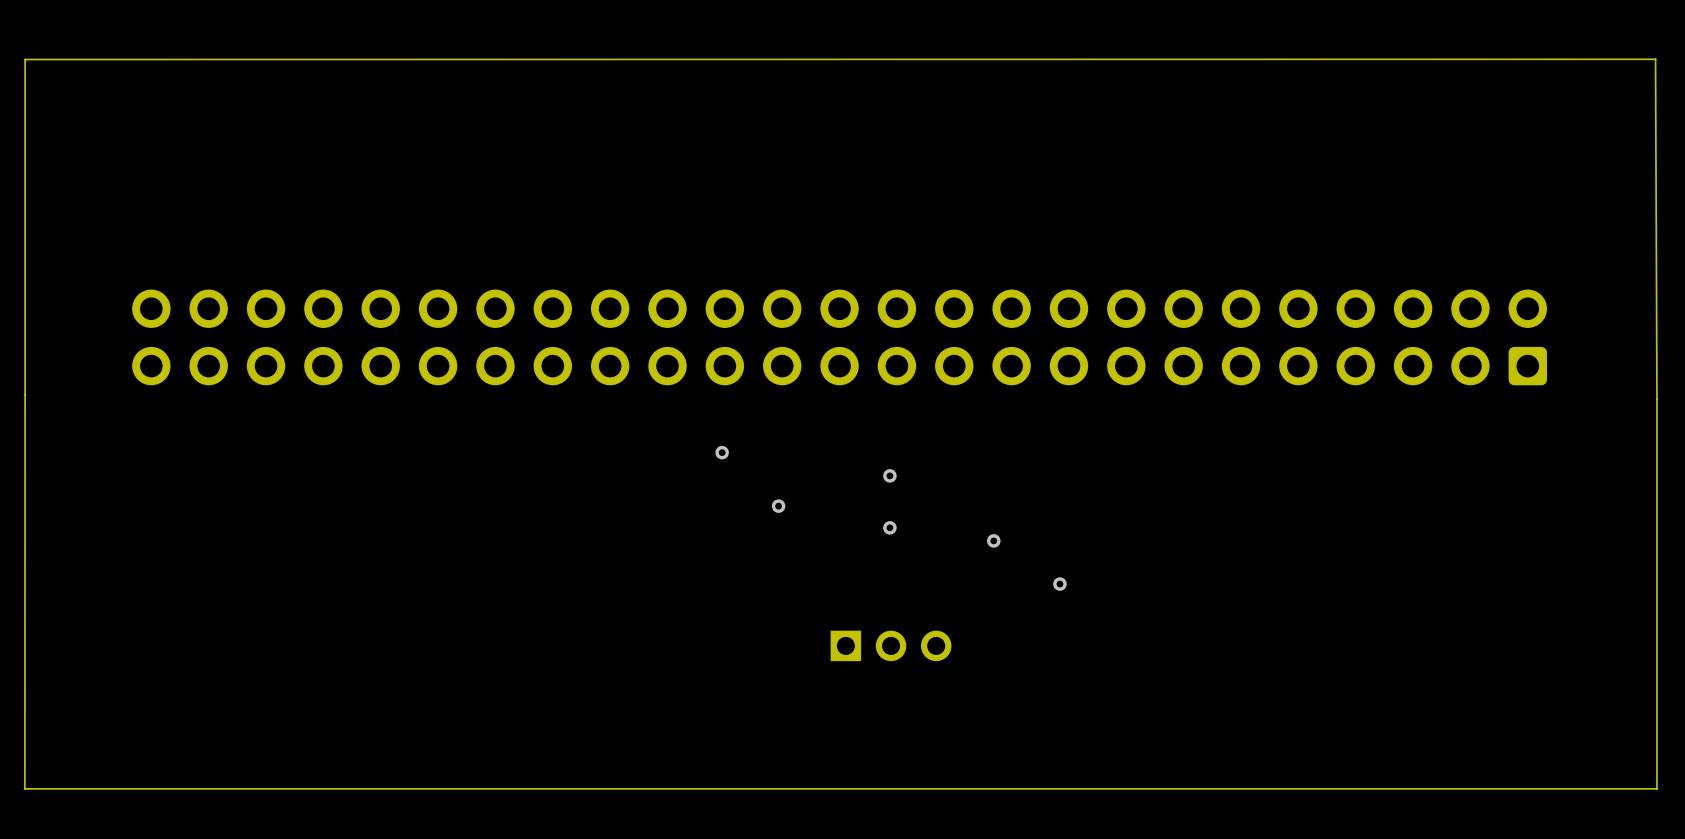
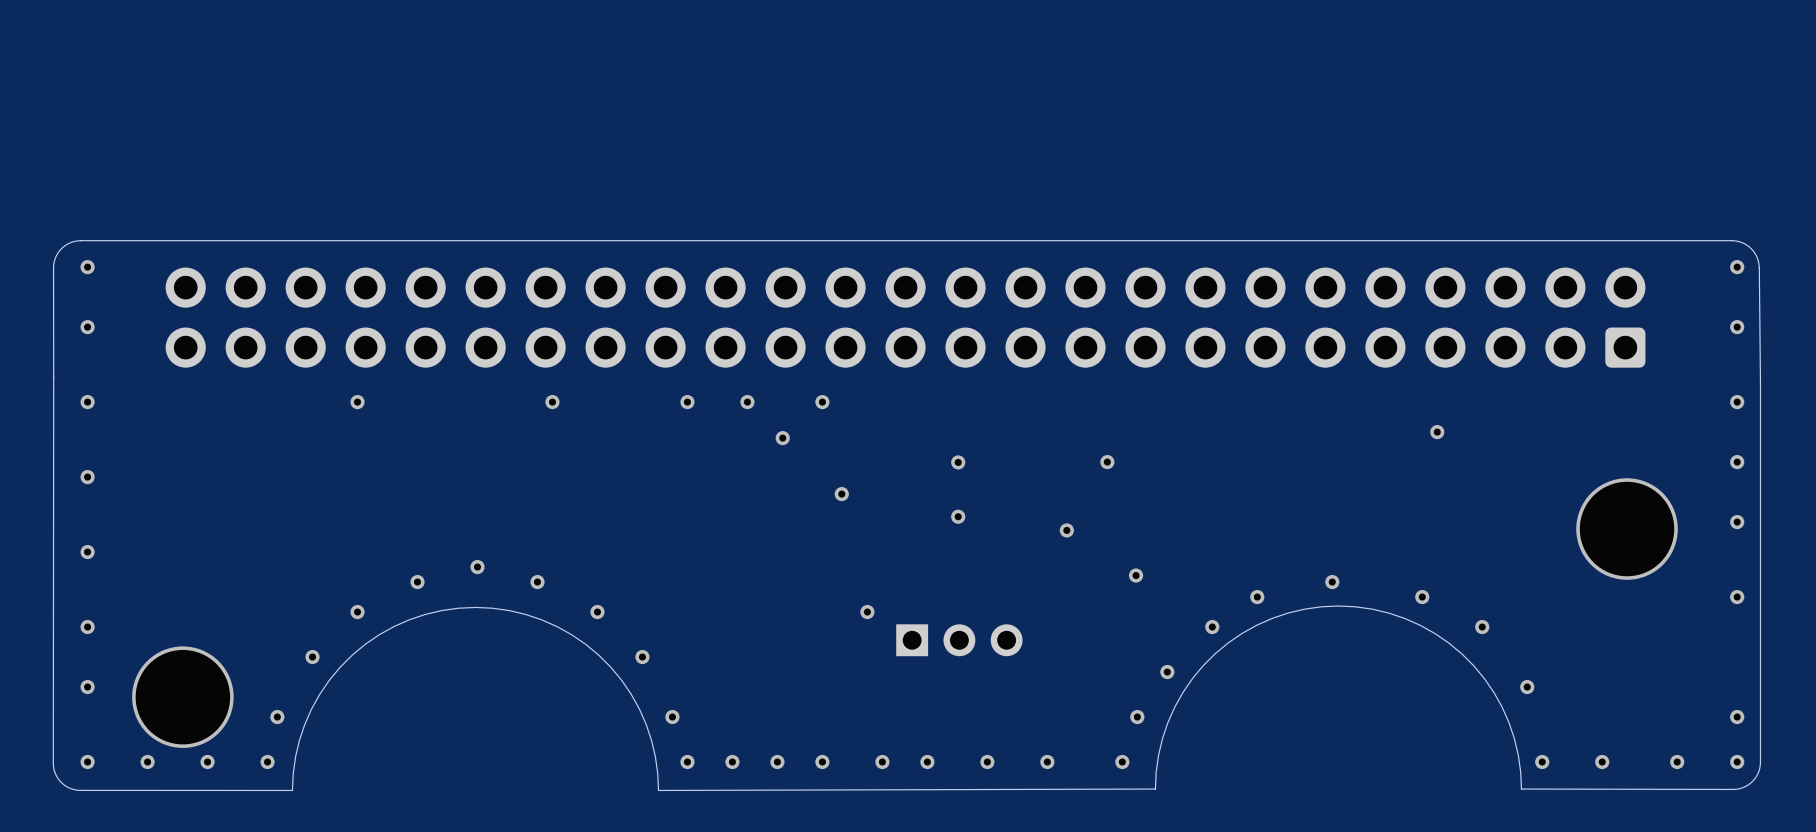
via: none -> (87, 267)
via: none -> (1737, 267)
via: none -> (87, 327)
via: none -> (1737, 327)
board edge: (1656, 398) (1655, 59) (25, 59) (24, 788) (1656, 788) (1656, 762) -> (1760, 381) (1758, 261) (1755, 253) (1748, 246) (1735, 240) (80, 240) (68, 243) (61, 248) (56, 256) (53, 264) (53, 763) (57, 777) (63, 784) (71, 788) (292, 790) (295, 756) (304, 724) (311, 708) (329, 680) (352, 655) (379, 634) (409, 619) (441, 610) (475, 607) (509, 610) (541, 619) (571, 634) (598, 655) (621, 680) (639, 708) (646, 724) (655, 756) (658, 790) (1155, 789) (1158, 755) (1167, 722) (1182, 692) (1192, 678) (1215, 653) (1242, 633) (1272, 618) (1304, 609) (1338, 606) (1372, 609) (1404, 618) (1434, 633) (1461, 653) (1484, 678) (1494, 692) (1509, 722) (1518, 755) (1521, 789) (1736, 789) (1747, 785) (1754, 779) (1758, 771) (1760, 762)
via: none -> (87, 402)
via: none -> (357, 402)
via: none -> (552, 402)
via: none -> (687, 402)
via: none -> (747, 402)
via: none -> (822, 402)
via: none -> (1737, 402)
via: none -> (1437, 432)
via: none -> (1107, 462)
via: none -> (1737, 462)
via: none -> (87, 477)
via: none -> (1737, 522)
via: none -> (1627, 529)
via: none -> (87, 552)
via: none -> (477, 567)
via: none -> (417, 582)
via: none -> (537, 582)
via: none -> (1332, 582)
via: none -> (1257, 597)
via: none -> (1422, 597)
via: none -> (1737, 597)
via: none -> (357, 612)
via: none -> (597, 612)
via: none -> (867, 612)
via: none -> (87, 627)
via: none -> (1212, 627)
via: none -> (1482, 627)
via: none -> (312, 657)
via: none -> (642, 657)
via: none -> (1167, 672)
via: none -> (87, 687)
via: none -> (1527, 687)
via: none -> (182, 697)
via: none -> (277, 717)
via: none -> (672, 717)
via: none -> (1137, 717)
via: none -> (1737, 717)
via: none -> (87, 762)
via: none -> (147, 762)
via: none -> (207, 762)
via: none -> (267, 762)
via: none -> (687, 762)
via: none -> (732, 762)
via: none -> (777, 762)
via: none -> (822, 762)
via: none -> (882, 762)
via: none -> (927, 762)
via: none -> (987, 762)
via: none -> (1047, 762)
via: none -> (1122, 762)
via: none -> (1542, 762)
via: none -> (1602, 762)
via: none -> (1677, 762)
via: none -> (1737, 762)

